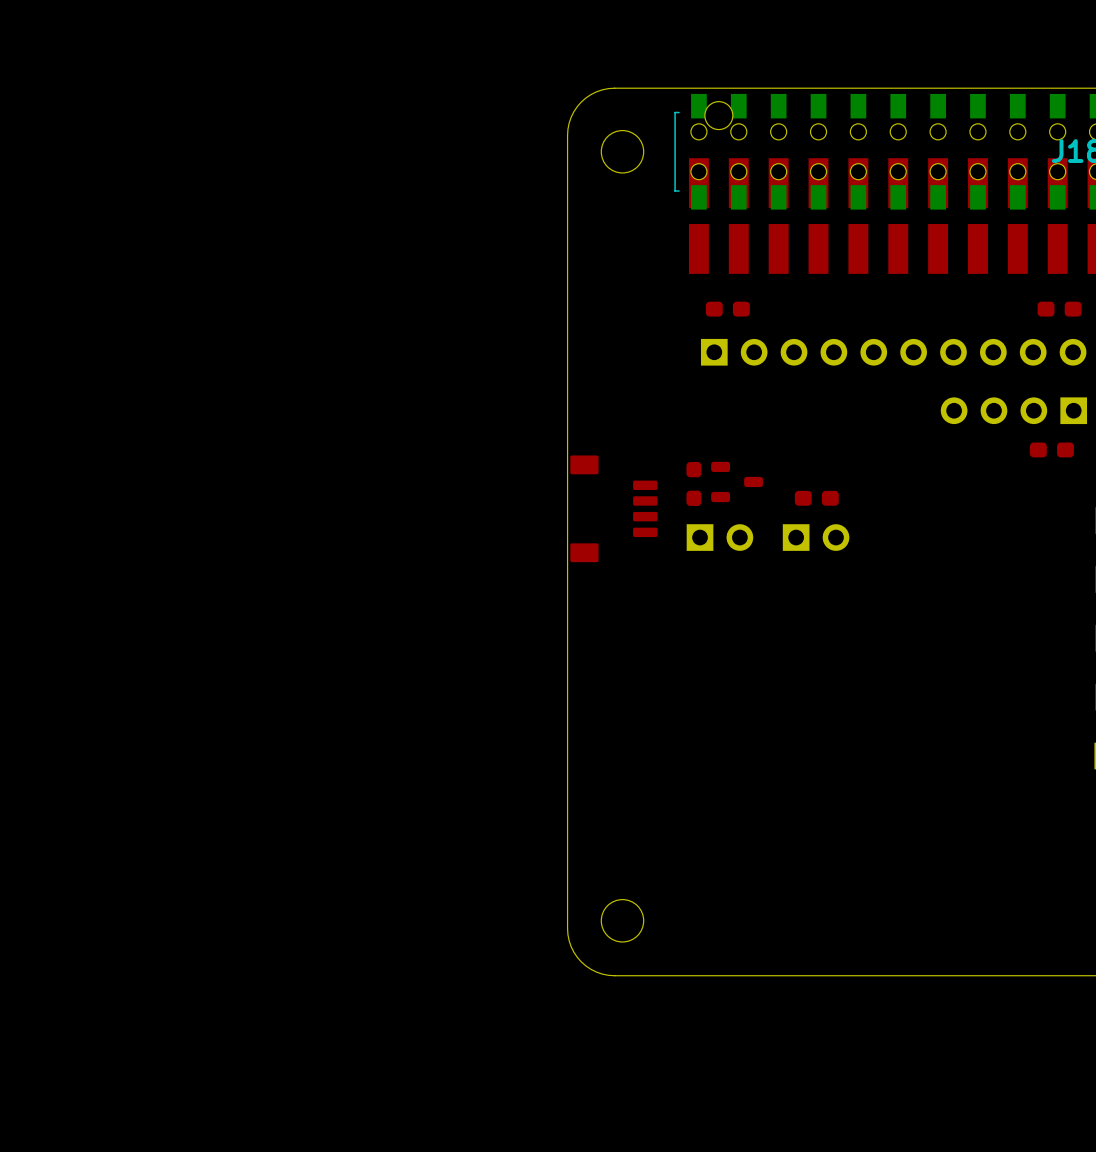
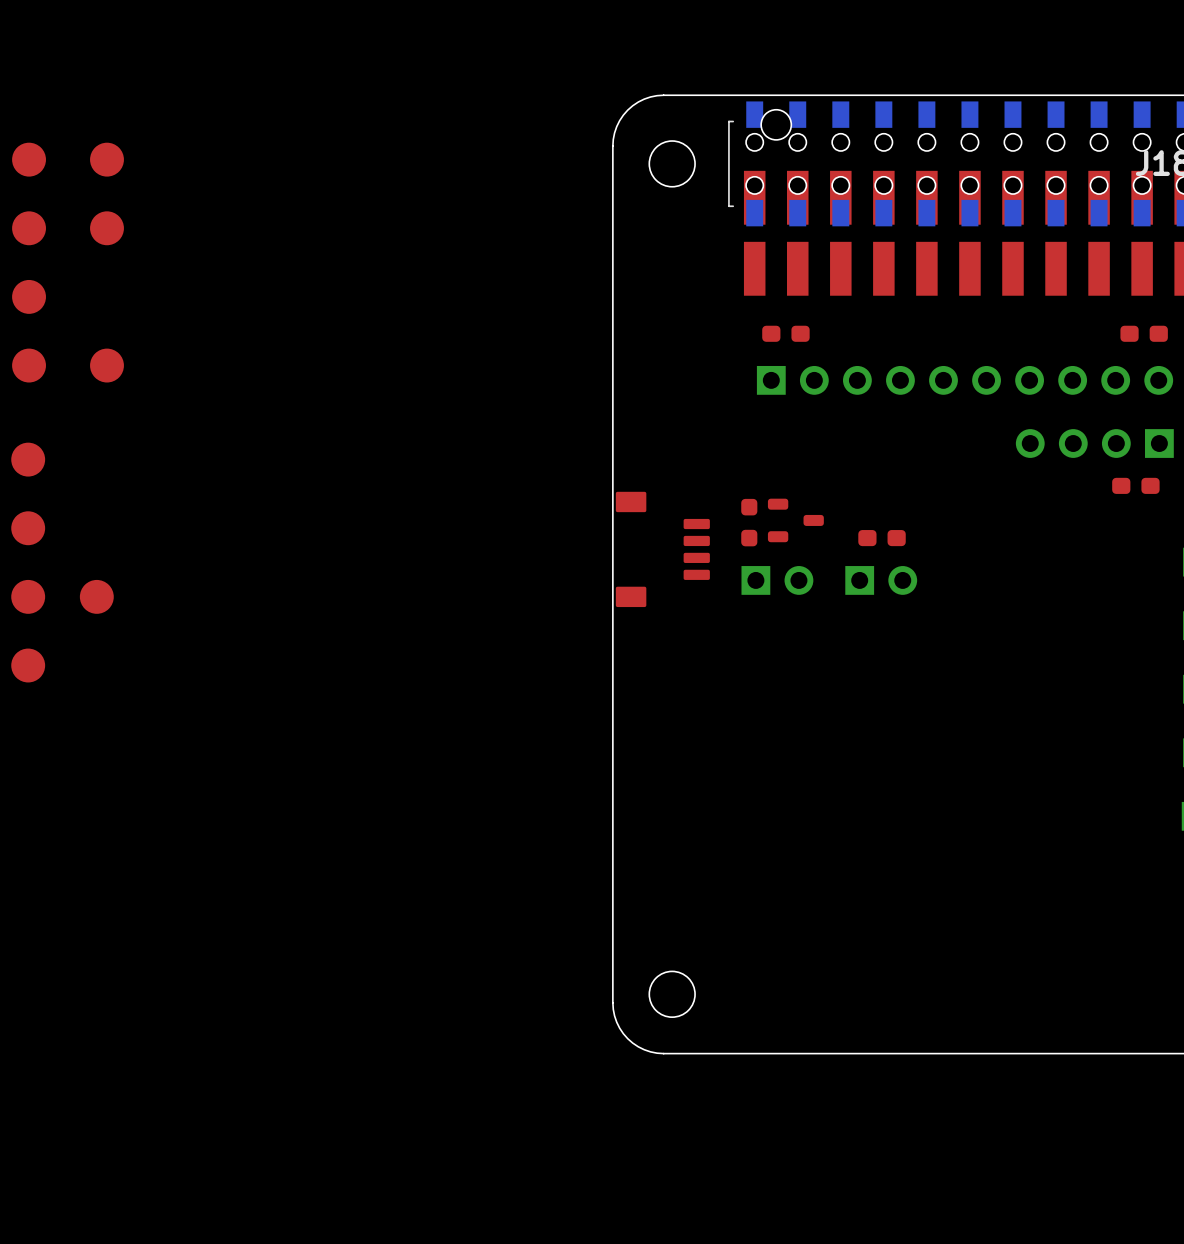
part: none -> (29, 159)
part: none -> (106, 159)
part: none -> (29, 228)
part: none -> (106, 228)
part: none -> (29, 296)
part: none -> (29, 365)
part: none -> (106, 365)
part: none -> (28, 459)
part: none -> (28, 528)
part: none -> (28, 596)
part: none -> (96, 596)
part: none -> (28, 665)

